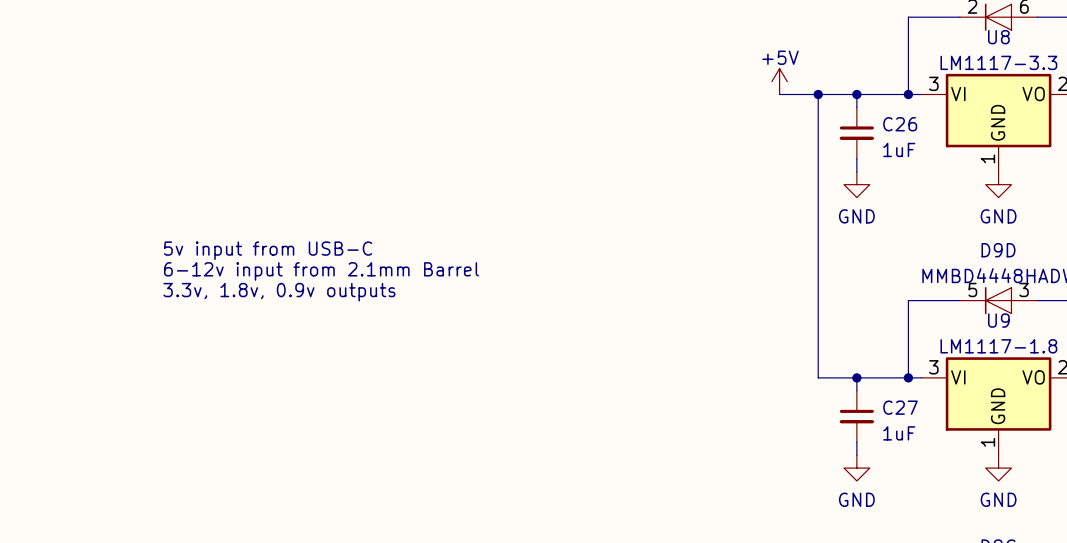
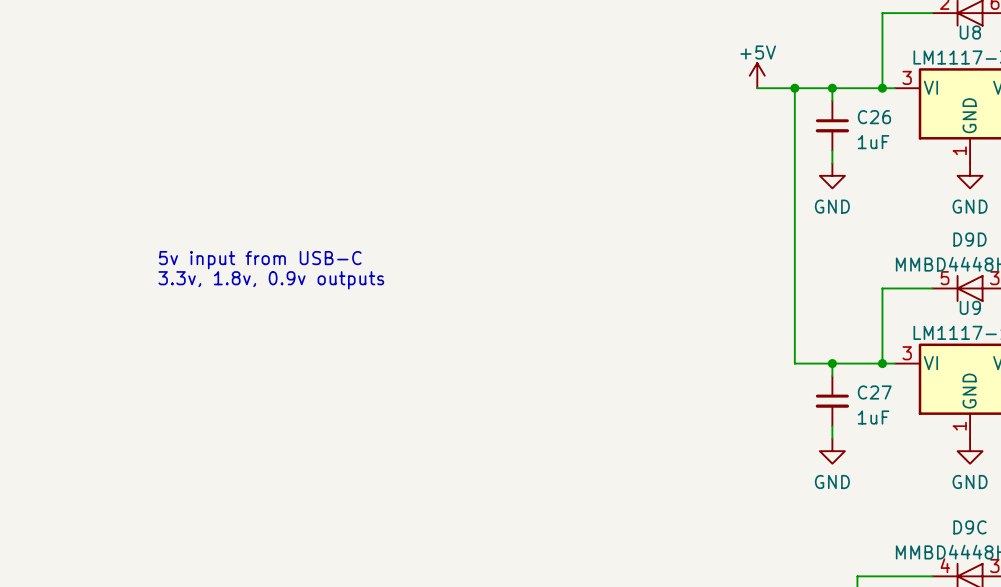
text: 5v input from USB-C (268, 250) -> none
text: 6-12v input from 2.1mm Barrel (321, 271) -> 5v input from USB-C (260, 260)

